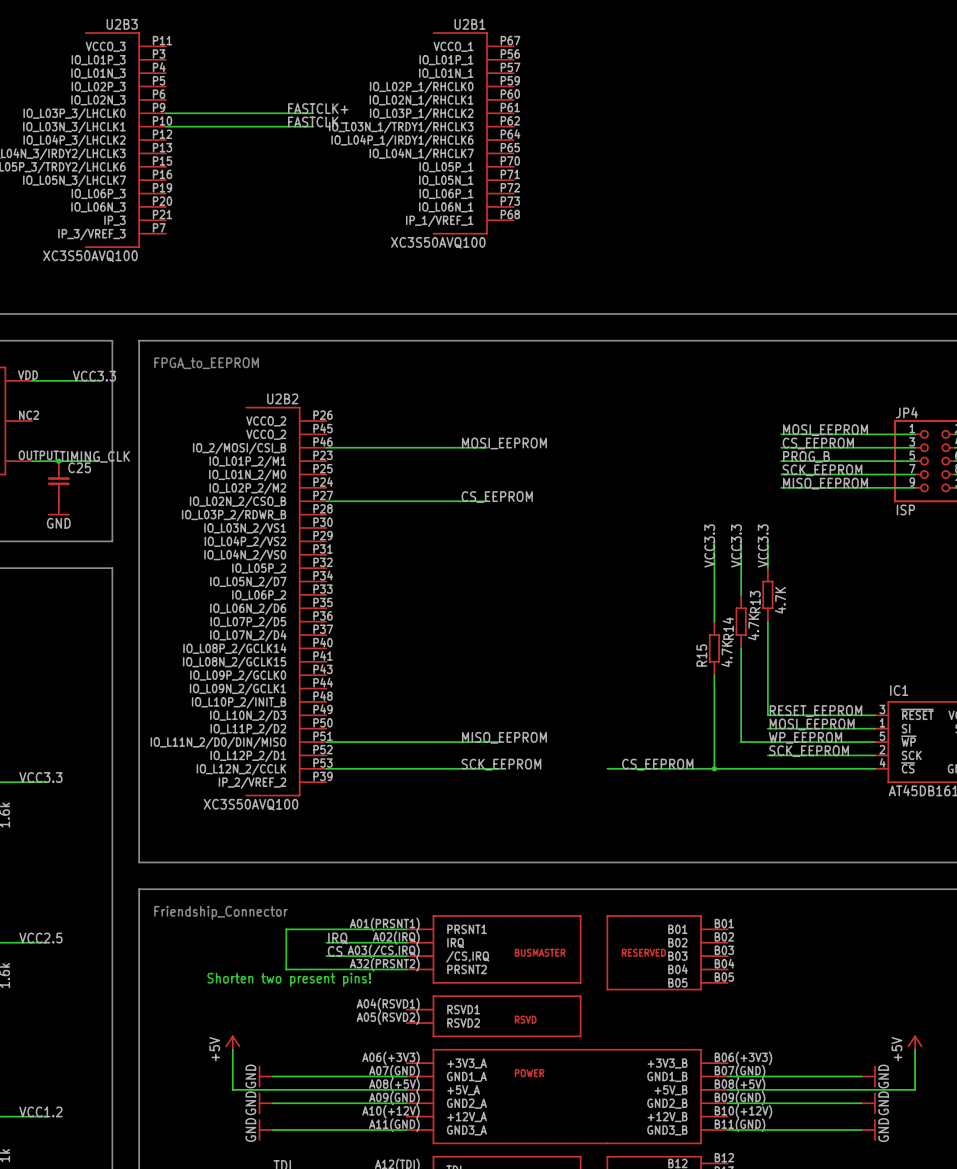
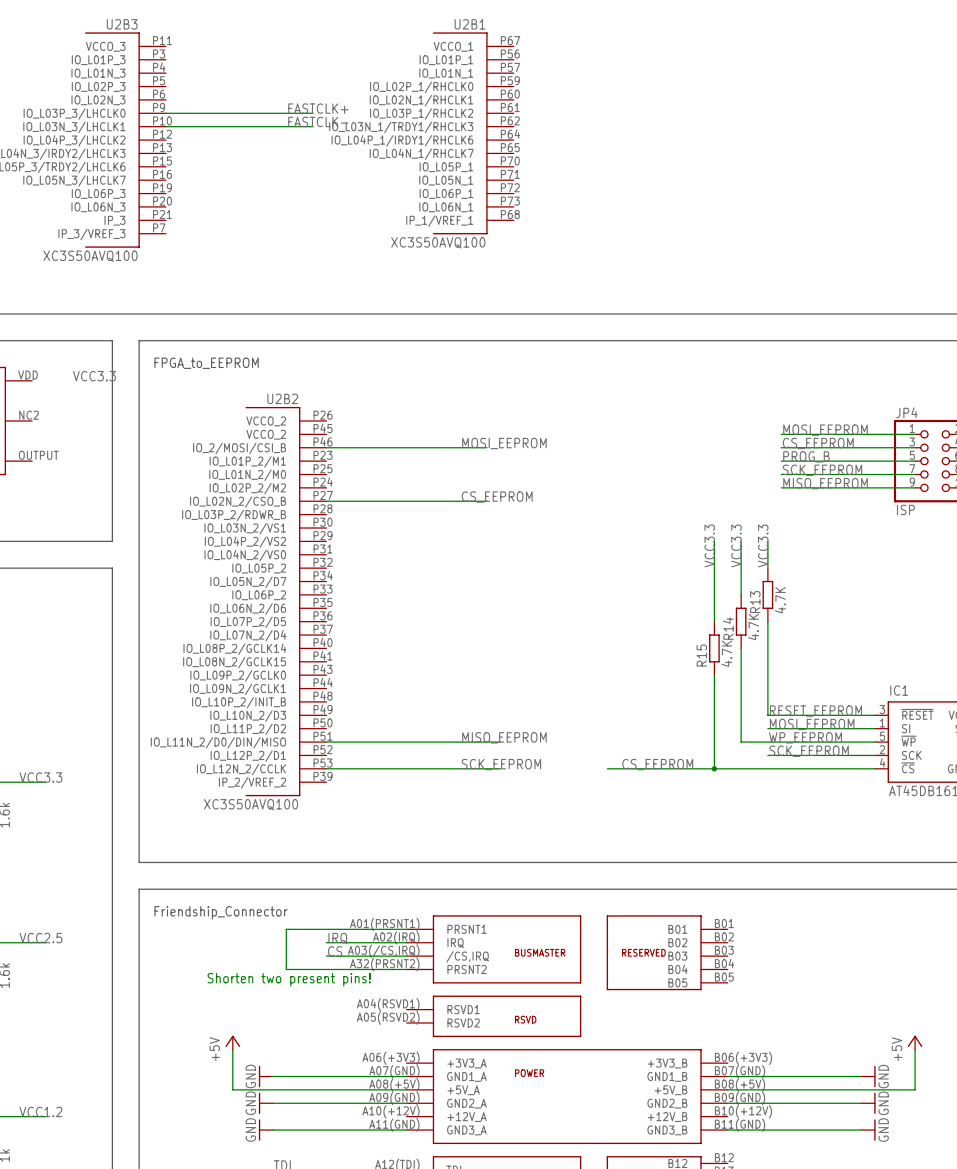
wire: (32, 380) (99, 380) -> none
label: TIMING_CLK (94, 456) -> none
wire: (32, 461) (99, 461) -> none
junction: (58, 461) -> none
C25: (58, 481) -> none
power symbol: GND (58, 508) -> none

